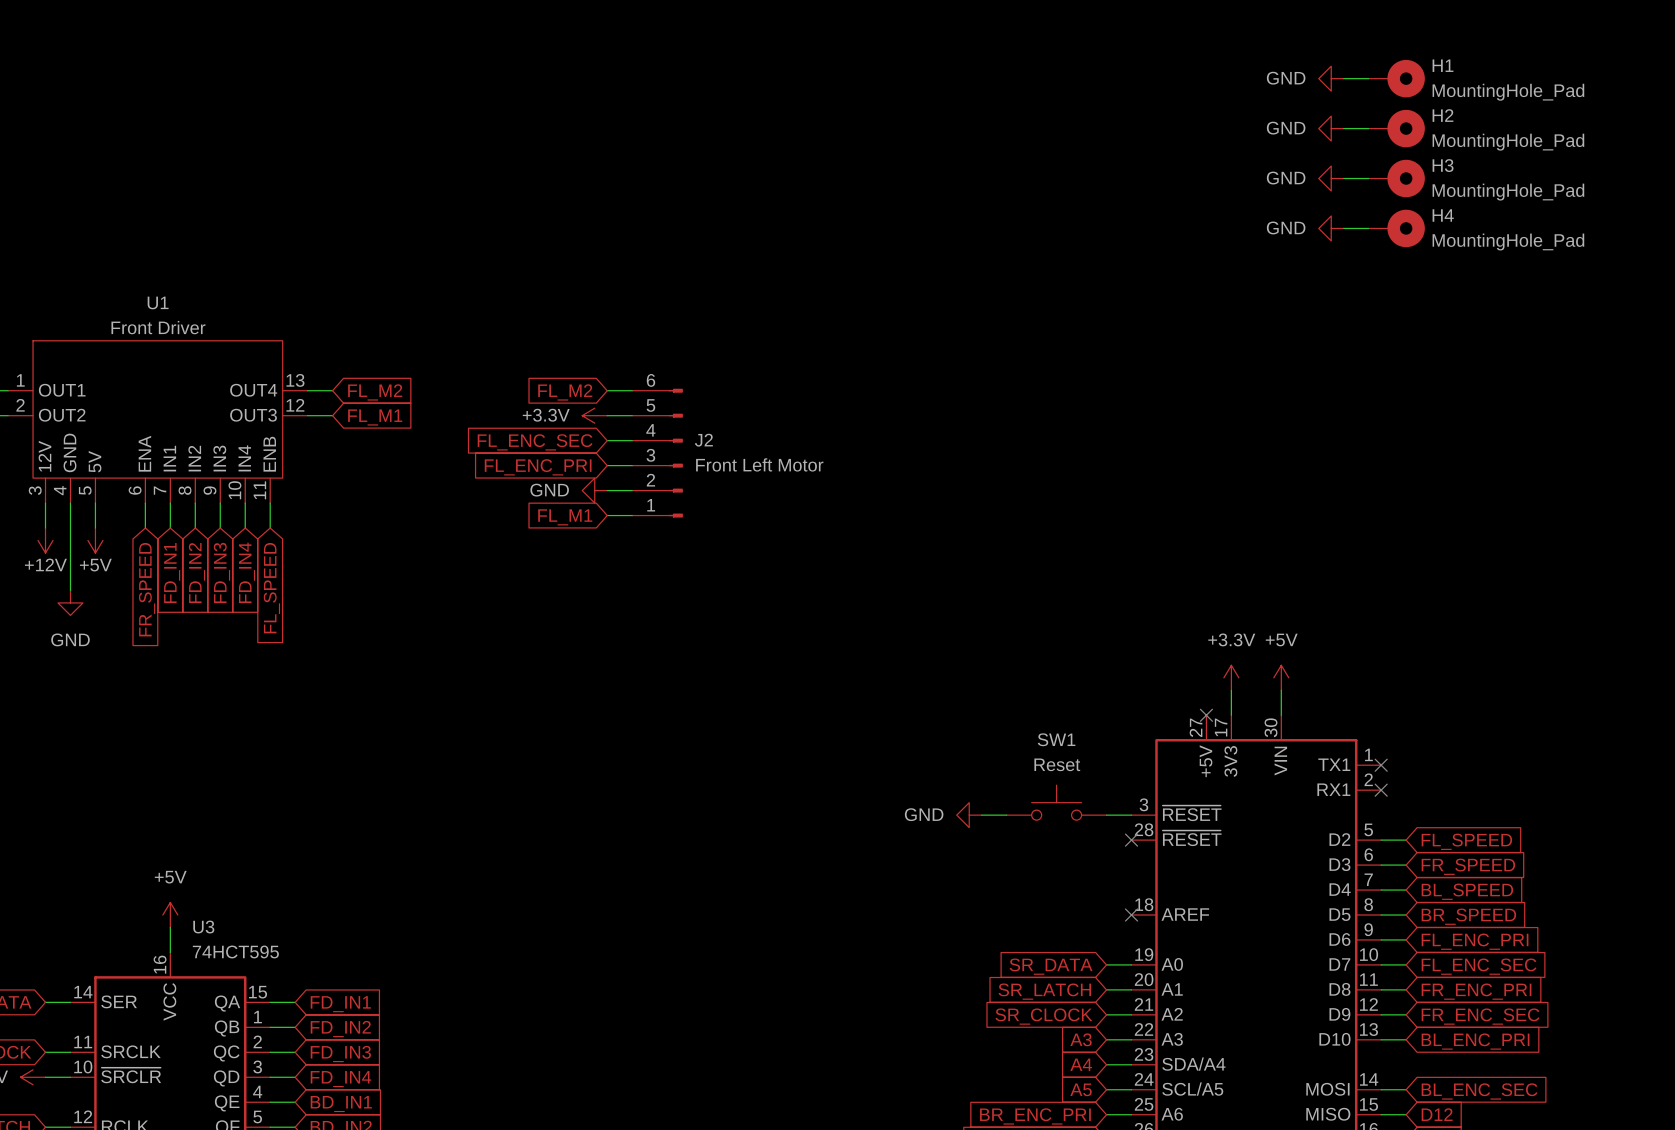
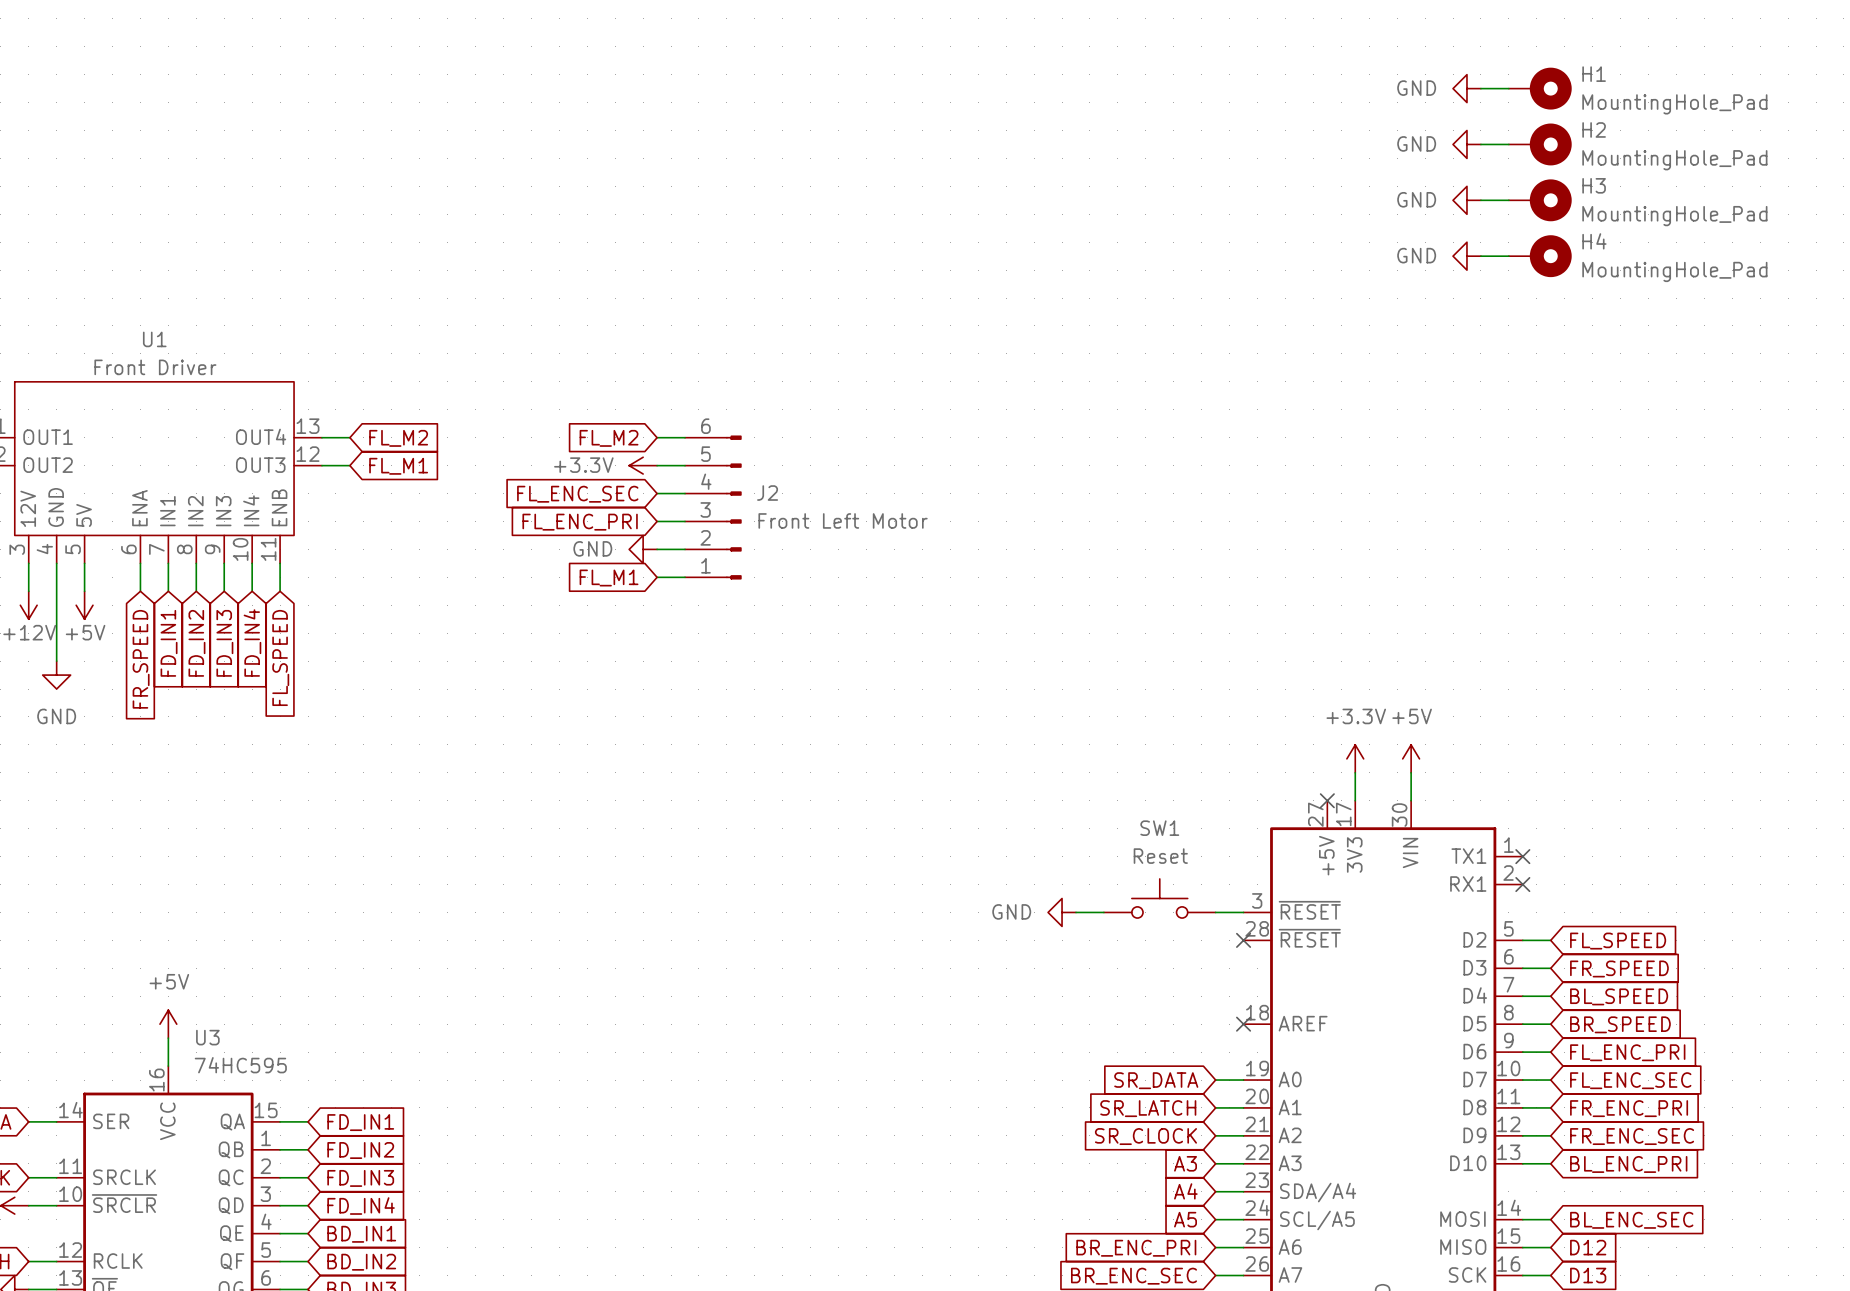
U3 value: 74HCT595 (235, 951) -> 74HC595 (240, 1065)

